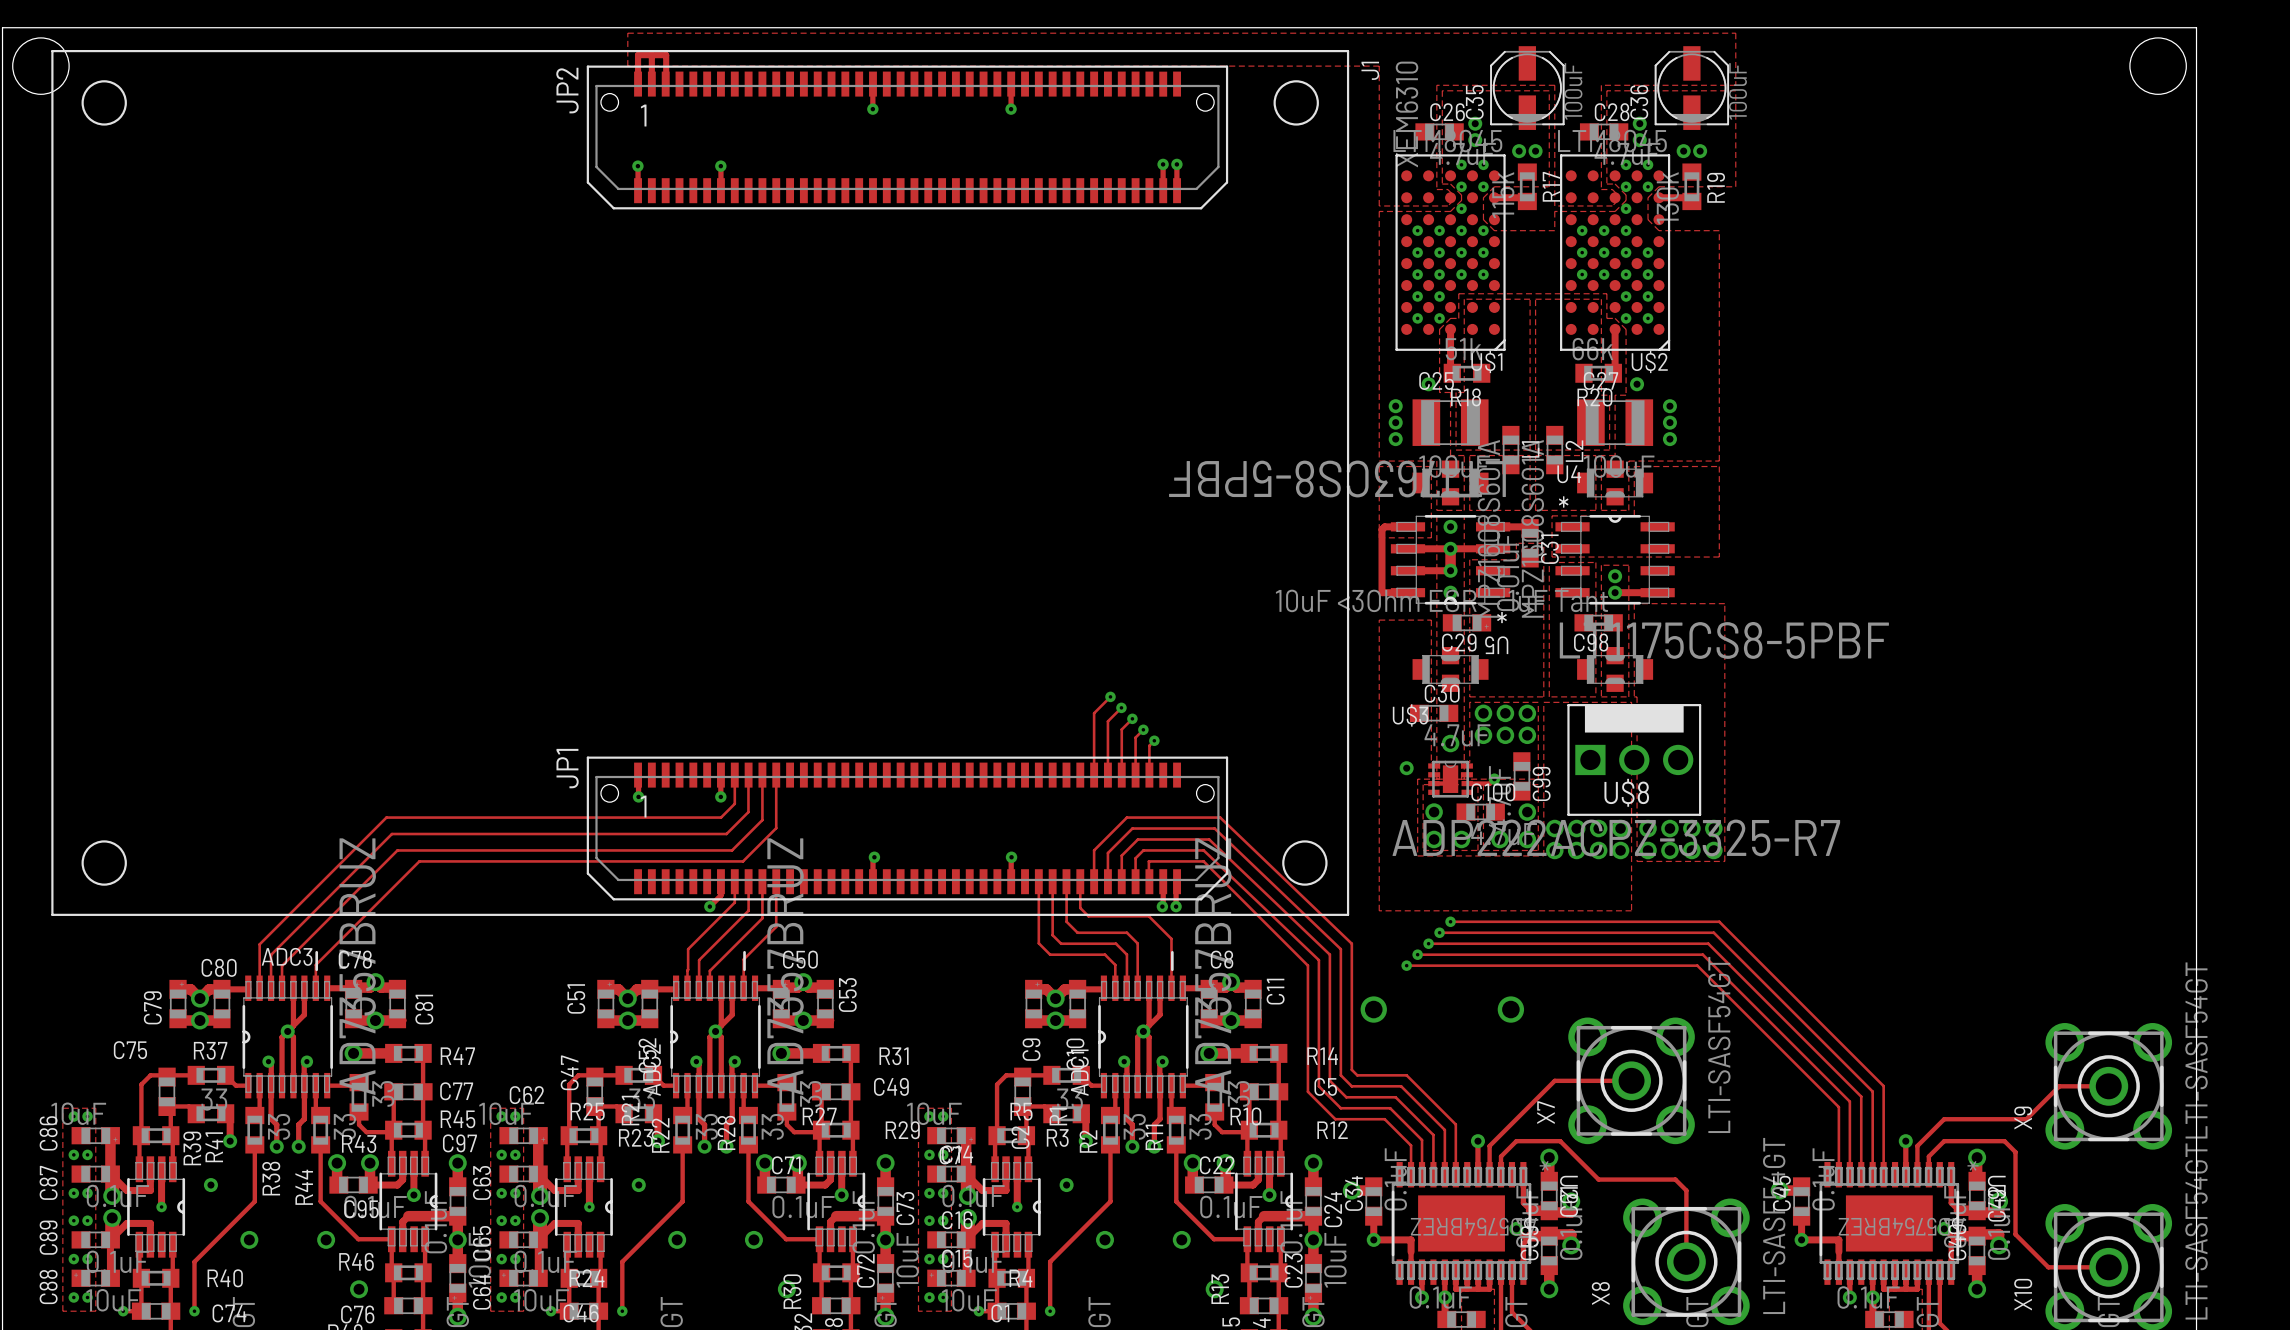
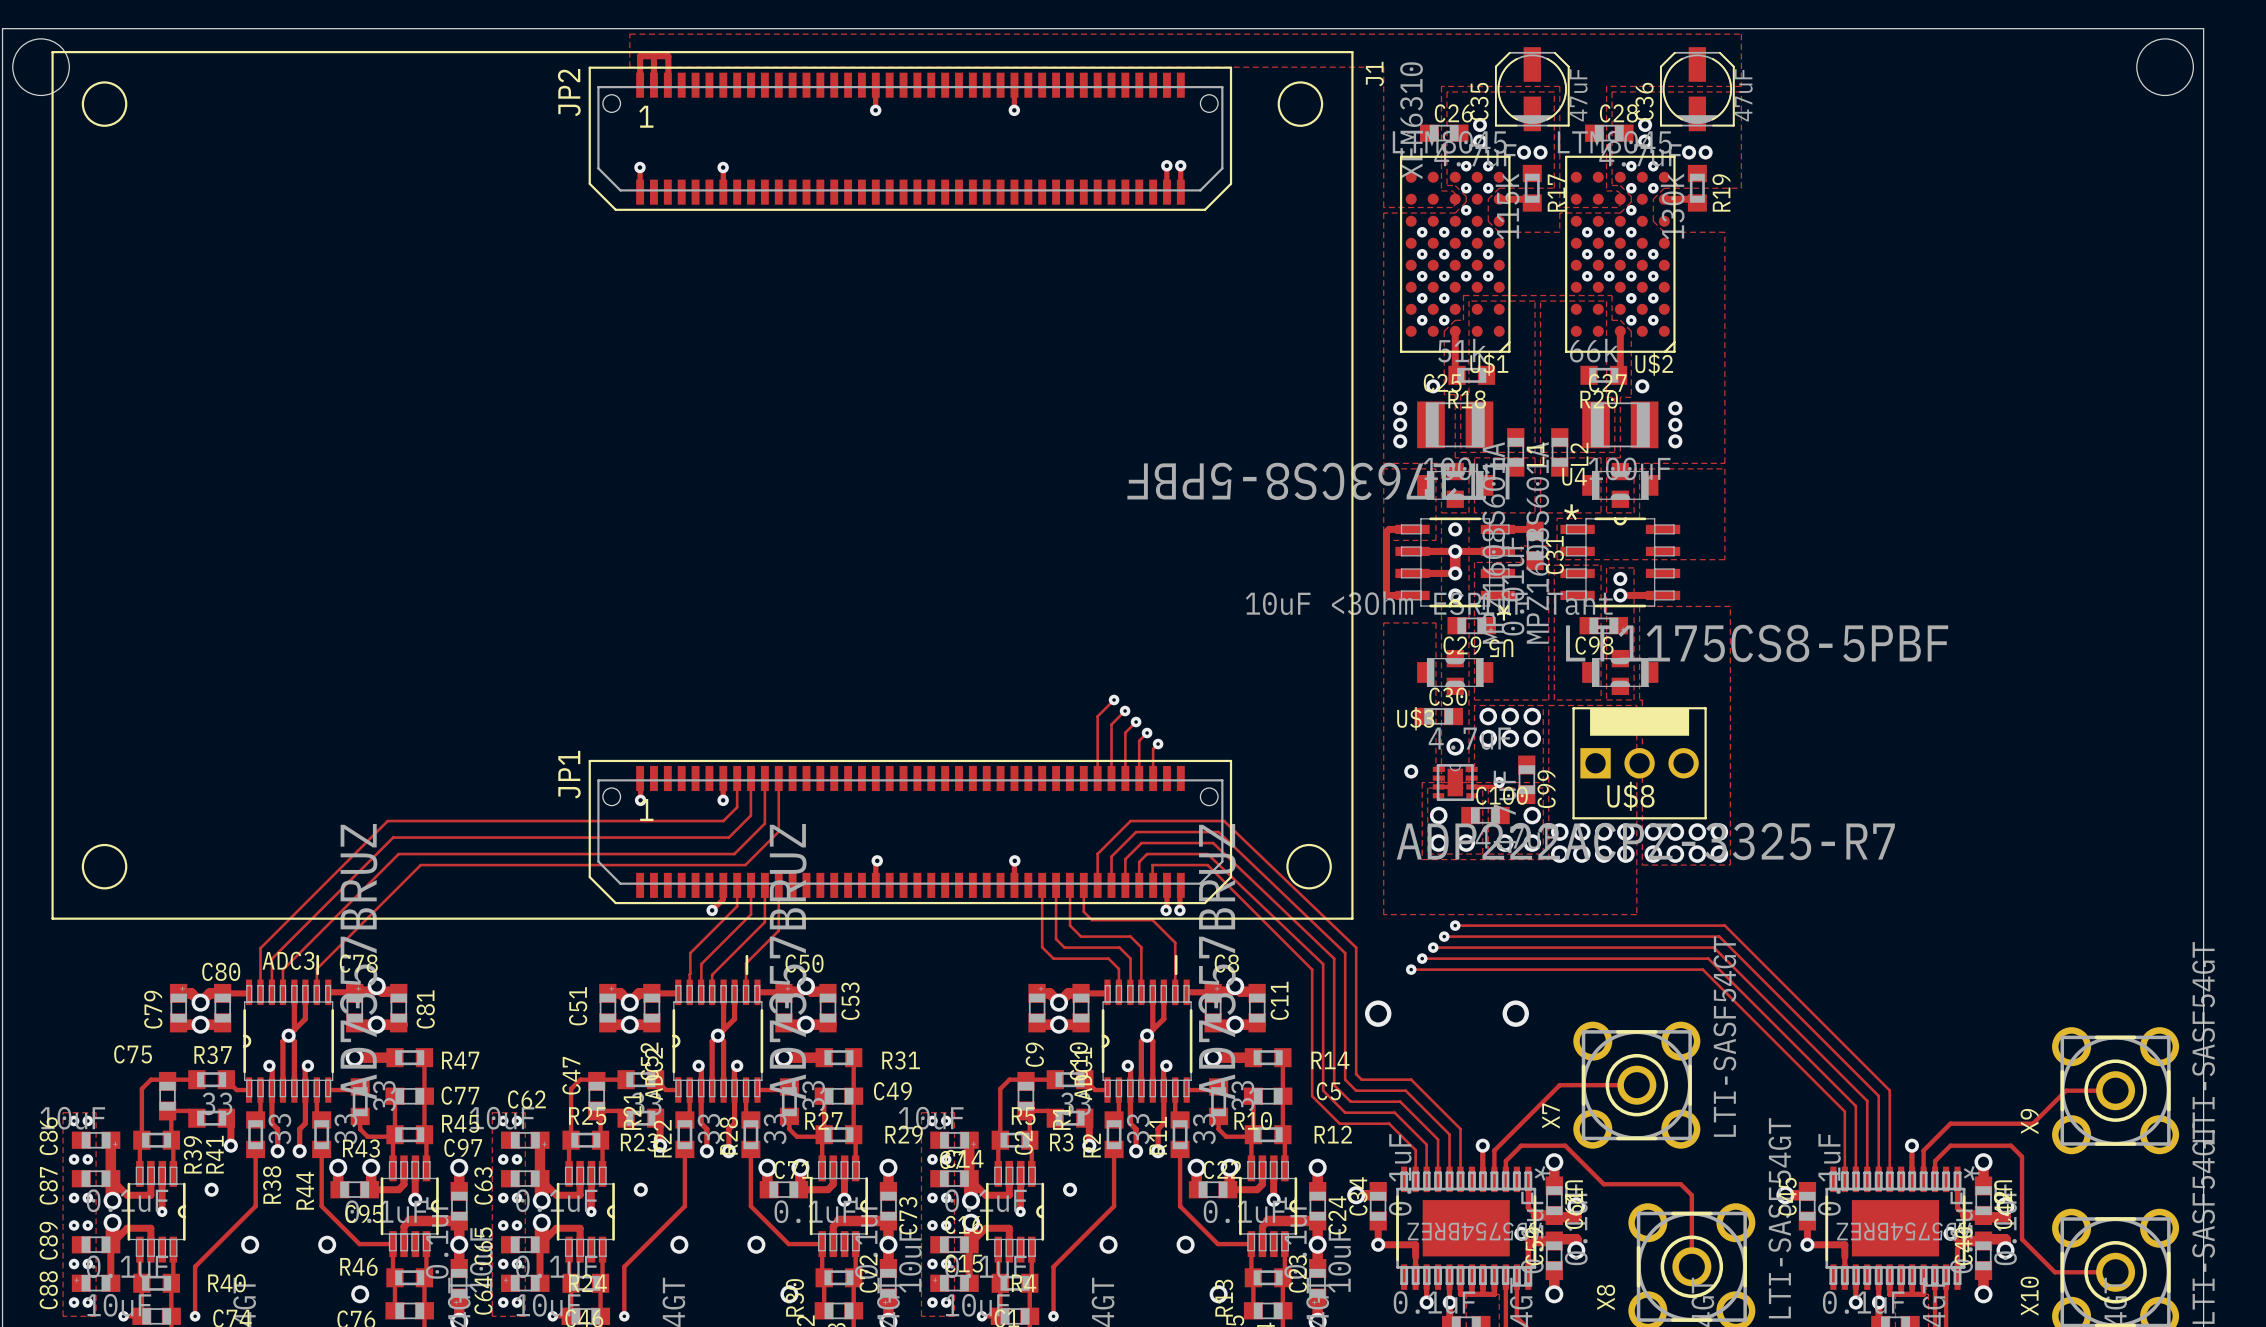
C35 value: 100uF (1573, 91) -> 47uF (1578, 95)
C36 value: 100uF (1737, 91) -> 47uF (1743, 95)

